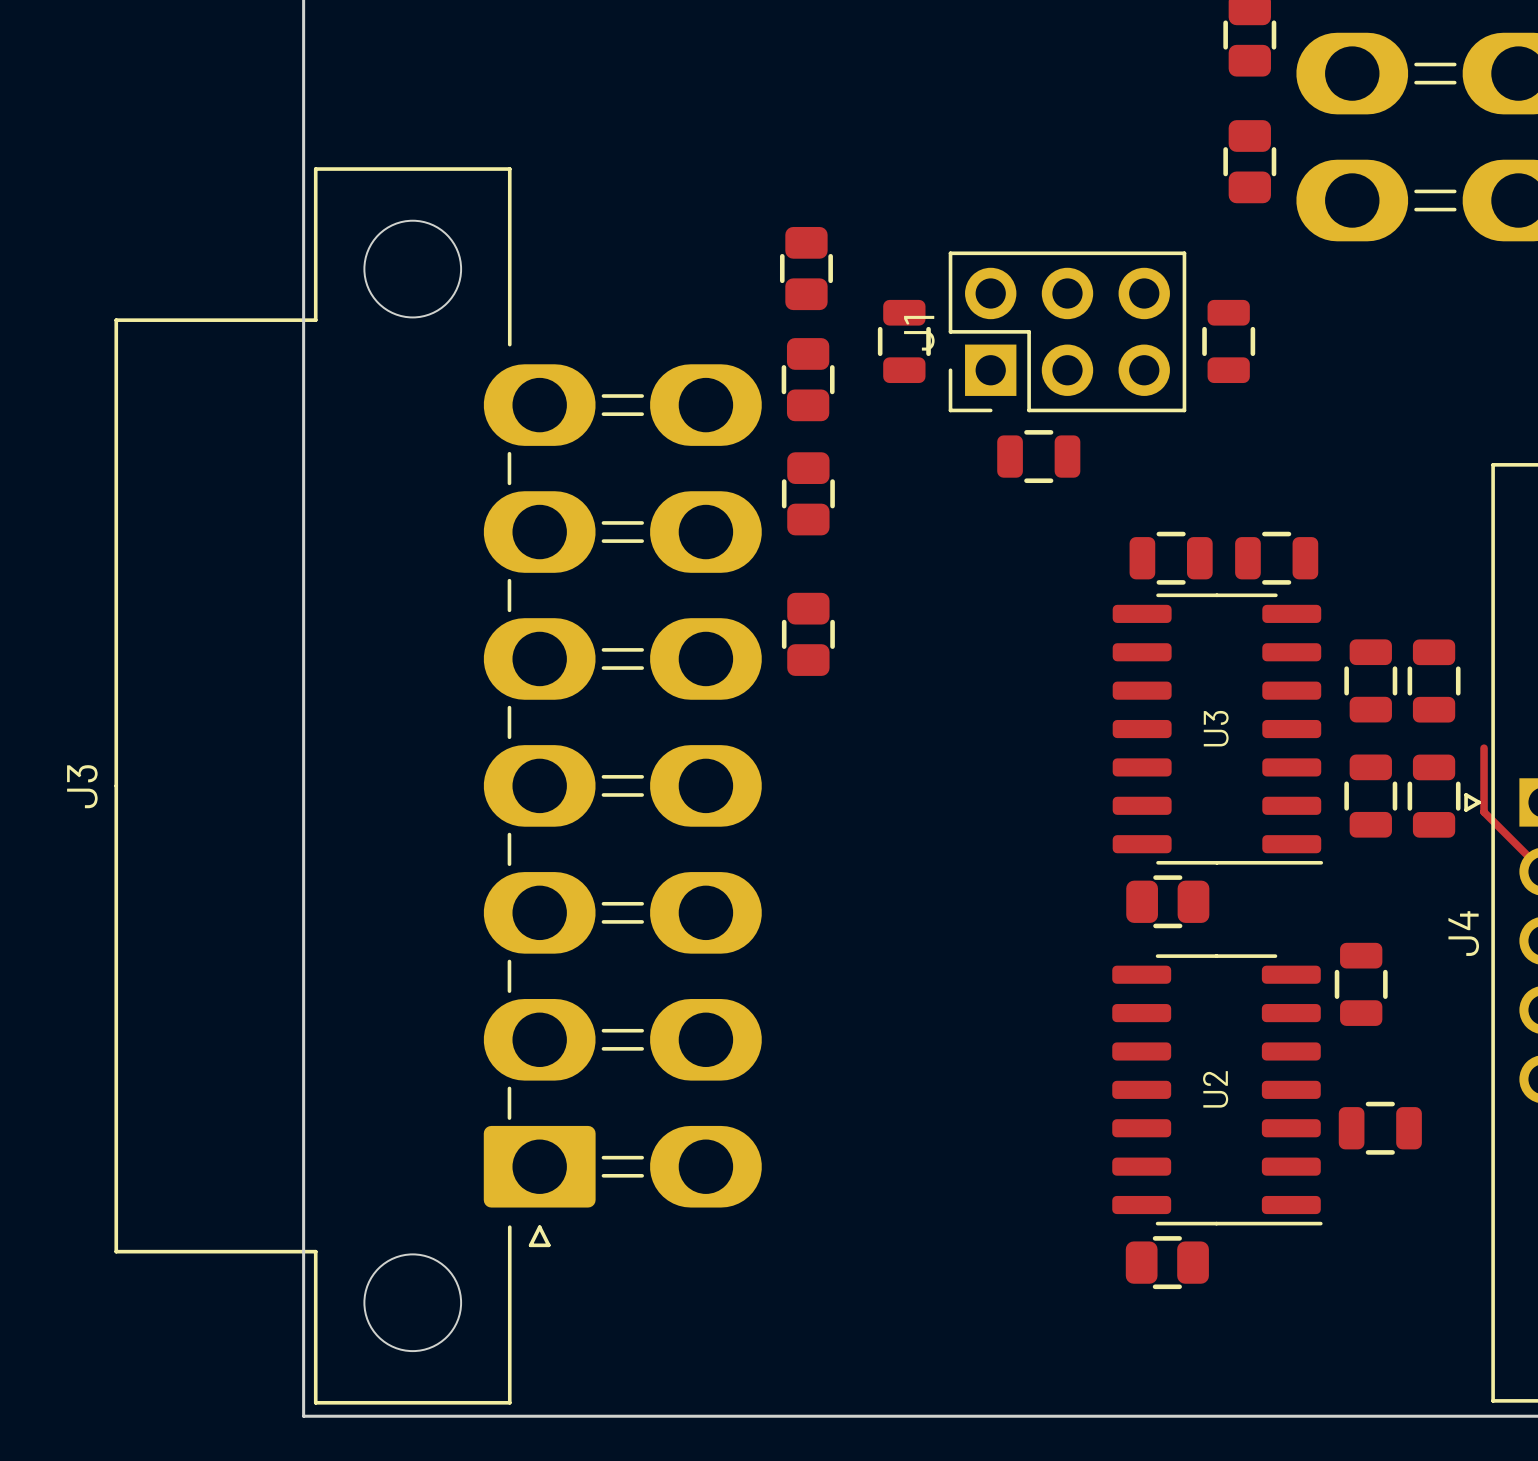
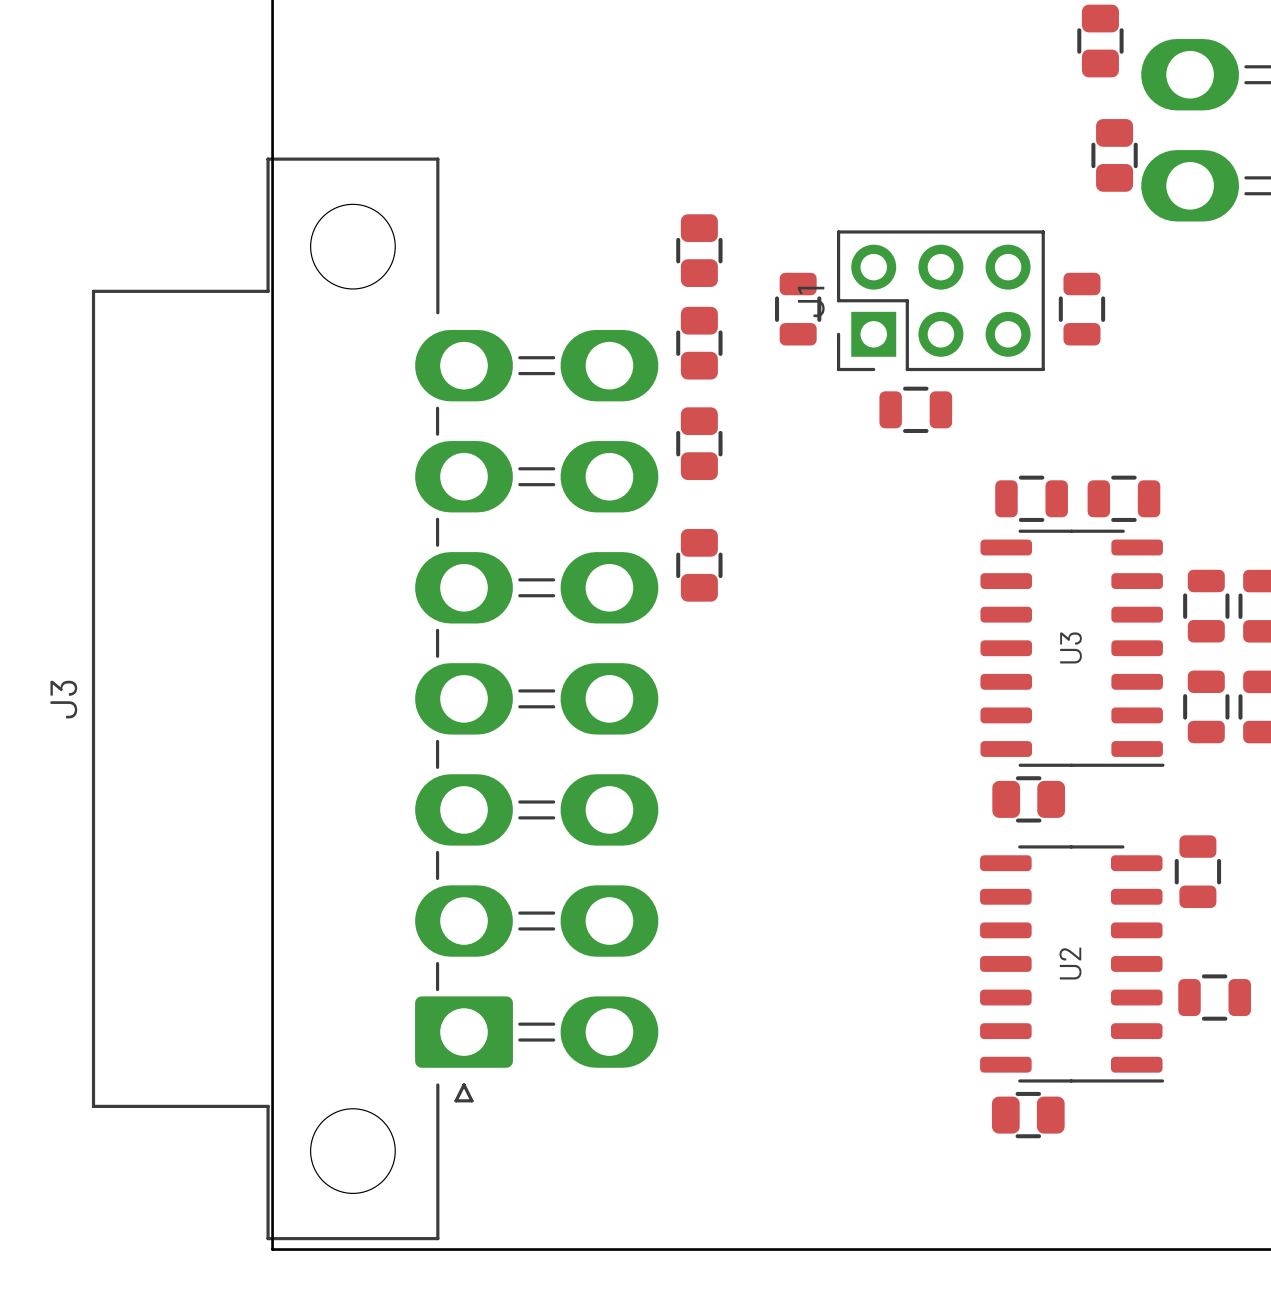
part position: (1249, 161) -> (1114, 155)
part position: (806, 268) -> (699, 250)
part position: (808, 379) -> (699, 343)
part position: (808, 493) -> (699, 443)
part position: (808, 634) -> (699, 565)
J3 position: (438, 785) -> (375, 698)

